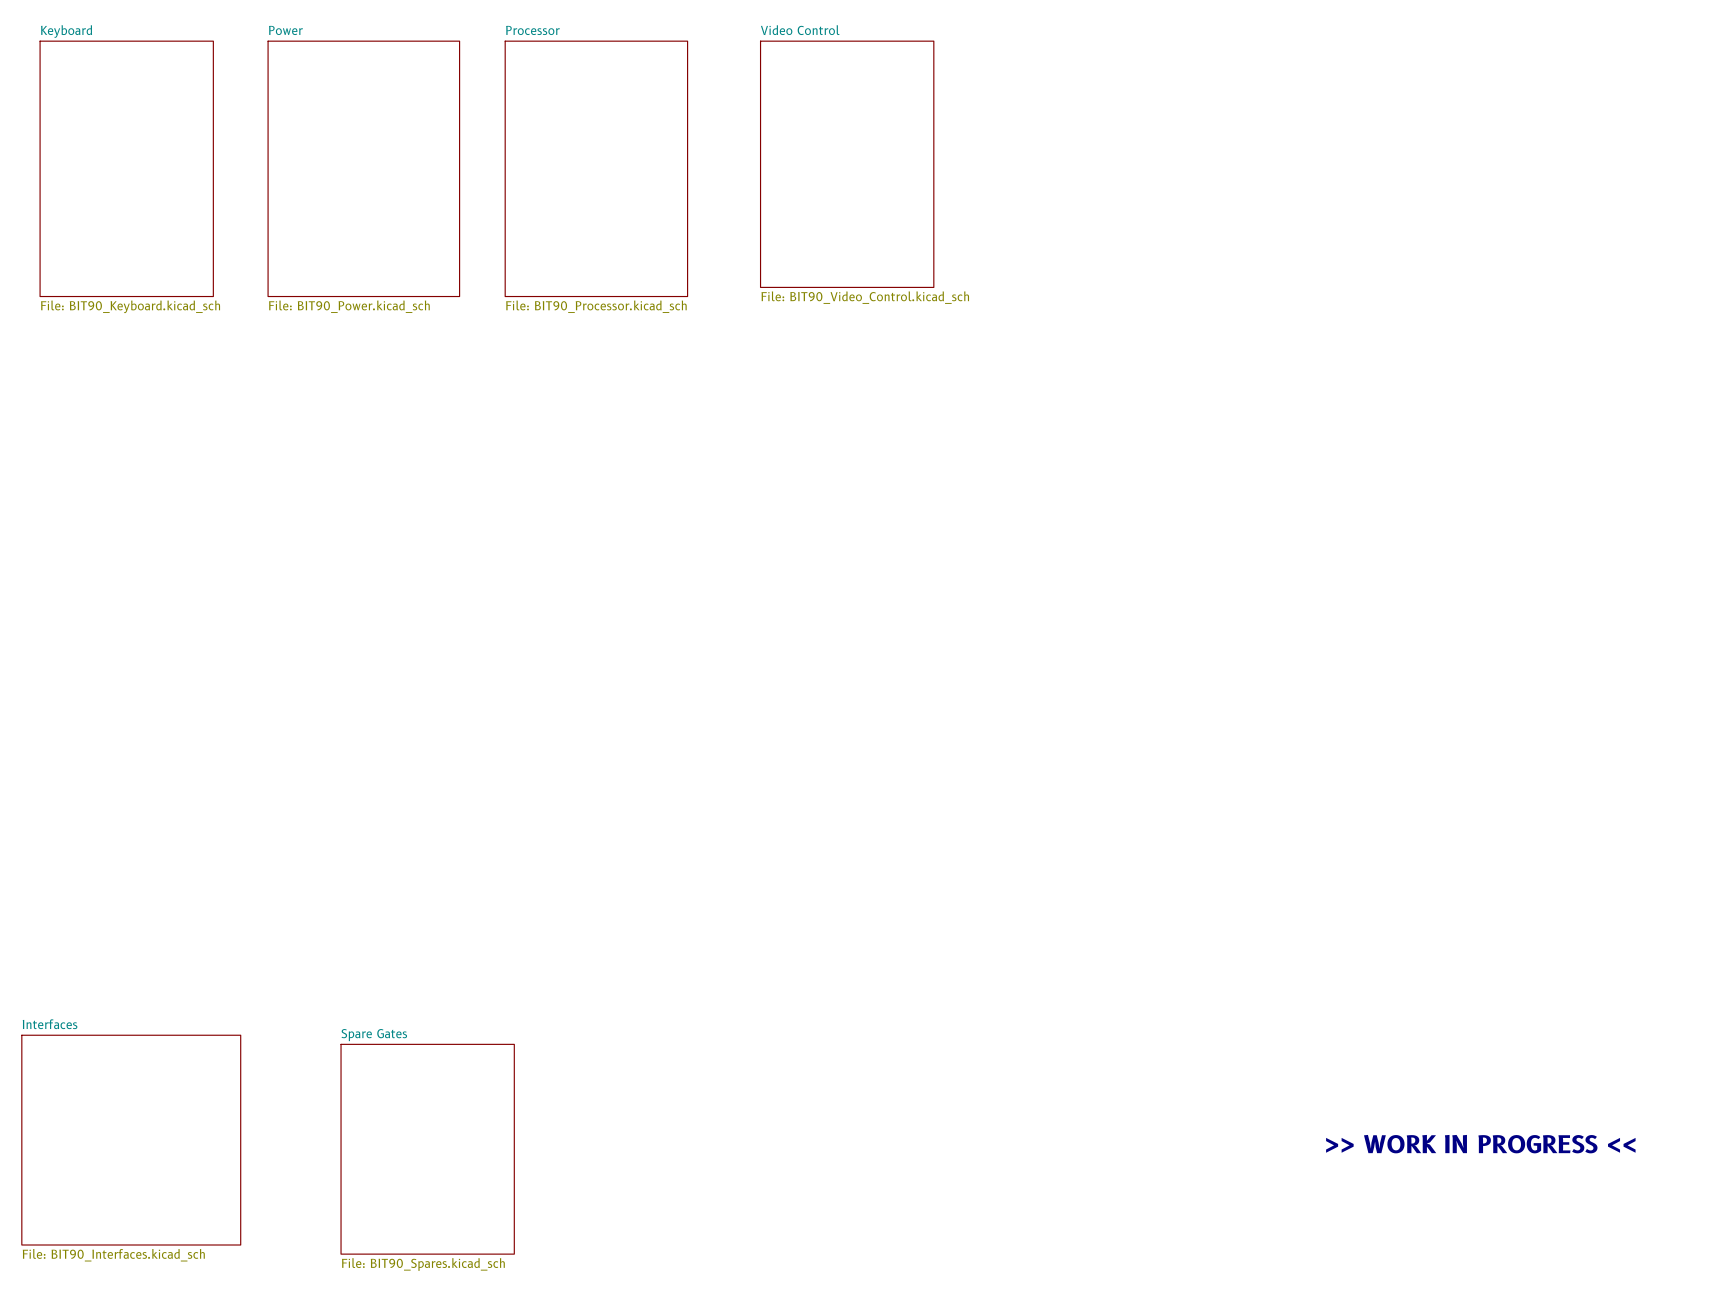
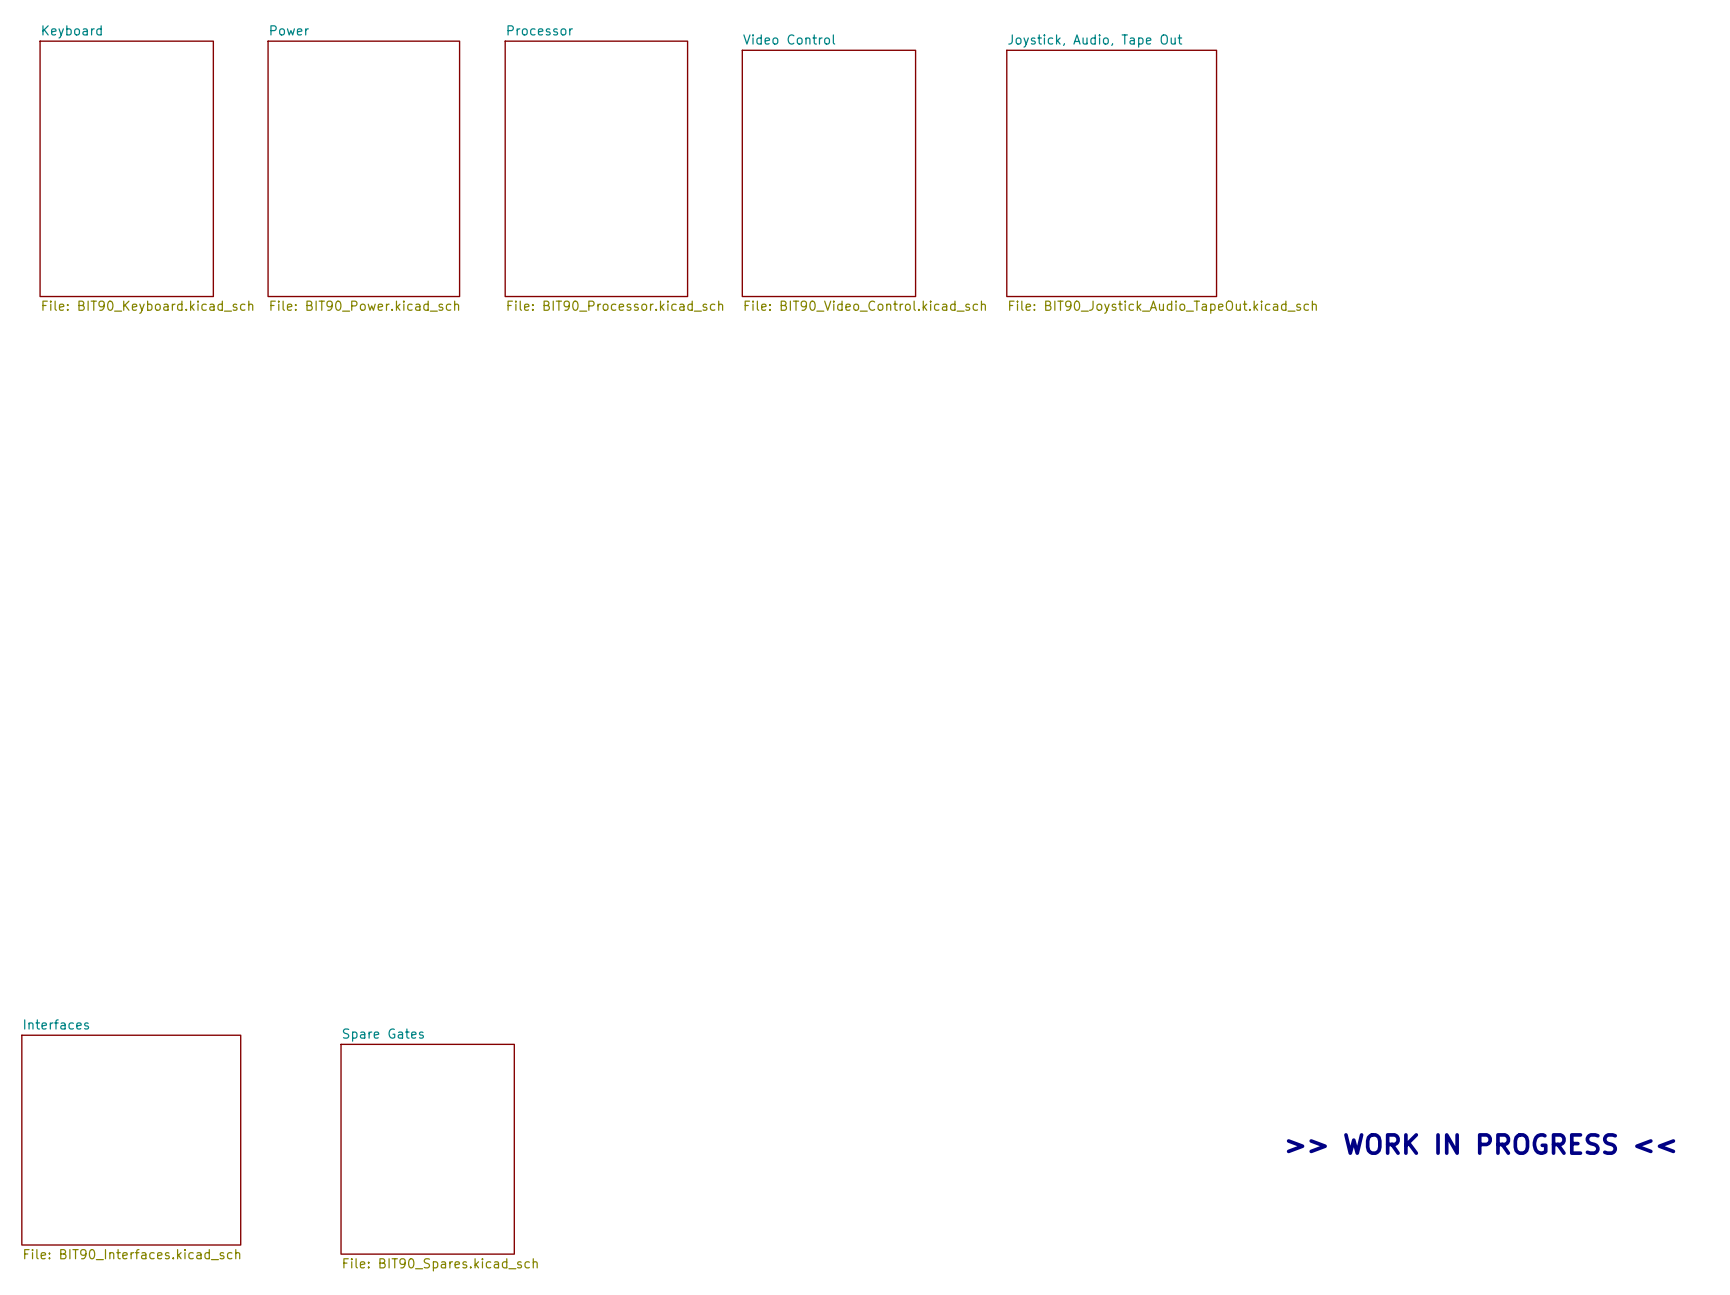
sheet Video Control position: (847, 164) -> (828, 173)
sheet Joystick, Audio, Tape Out: none -> File: BIT90_Joystick_Audio_TapeOut.kicad_sch (1111, 173)

